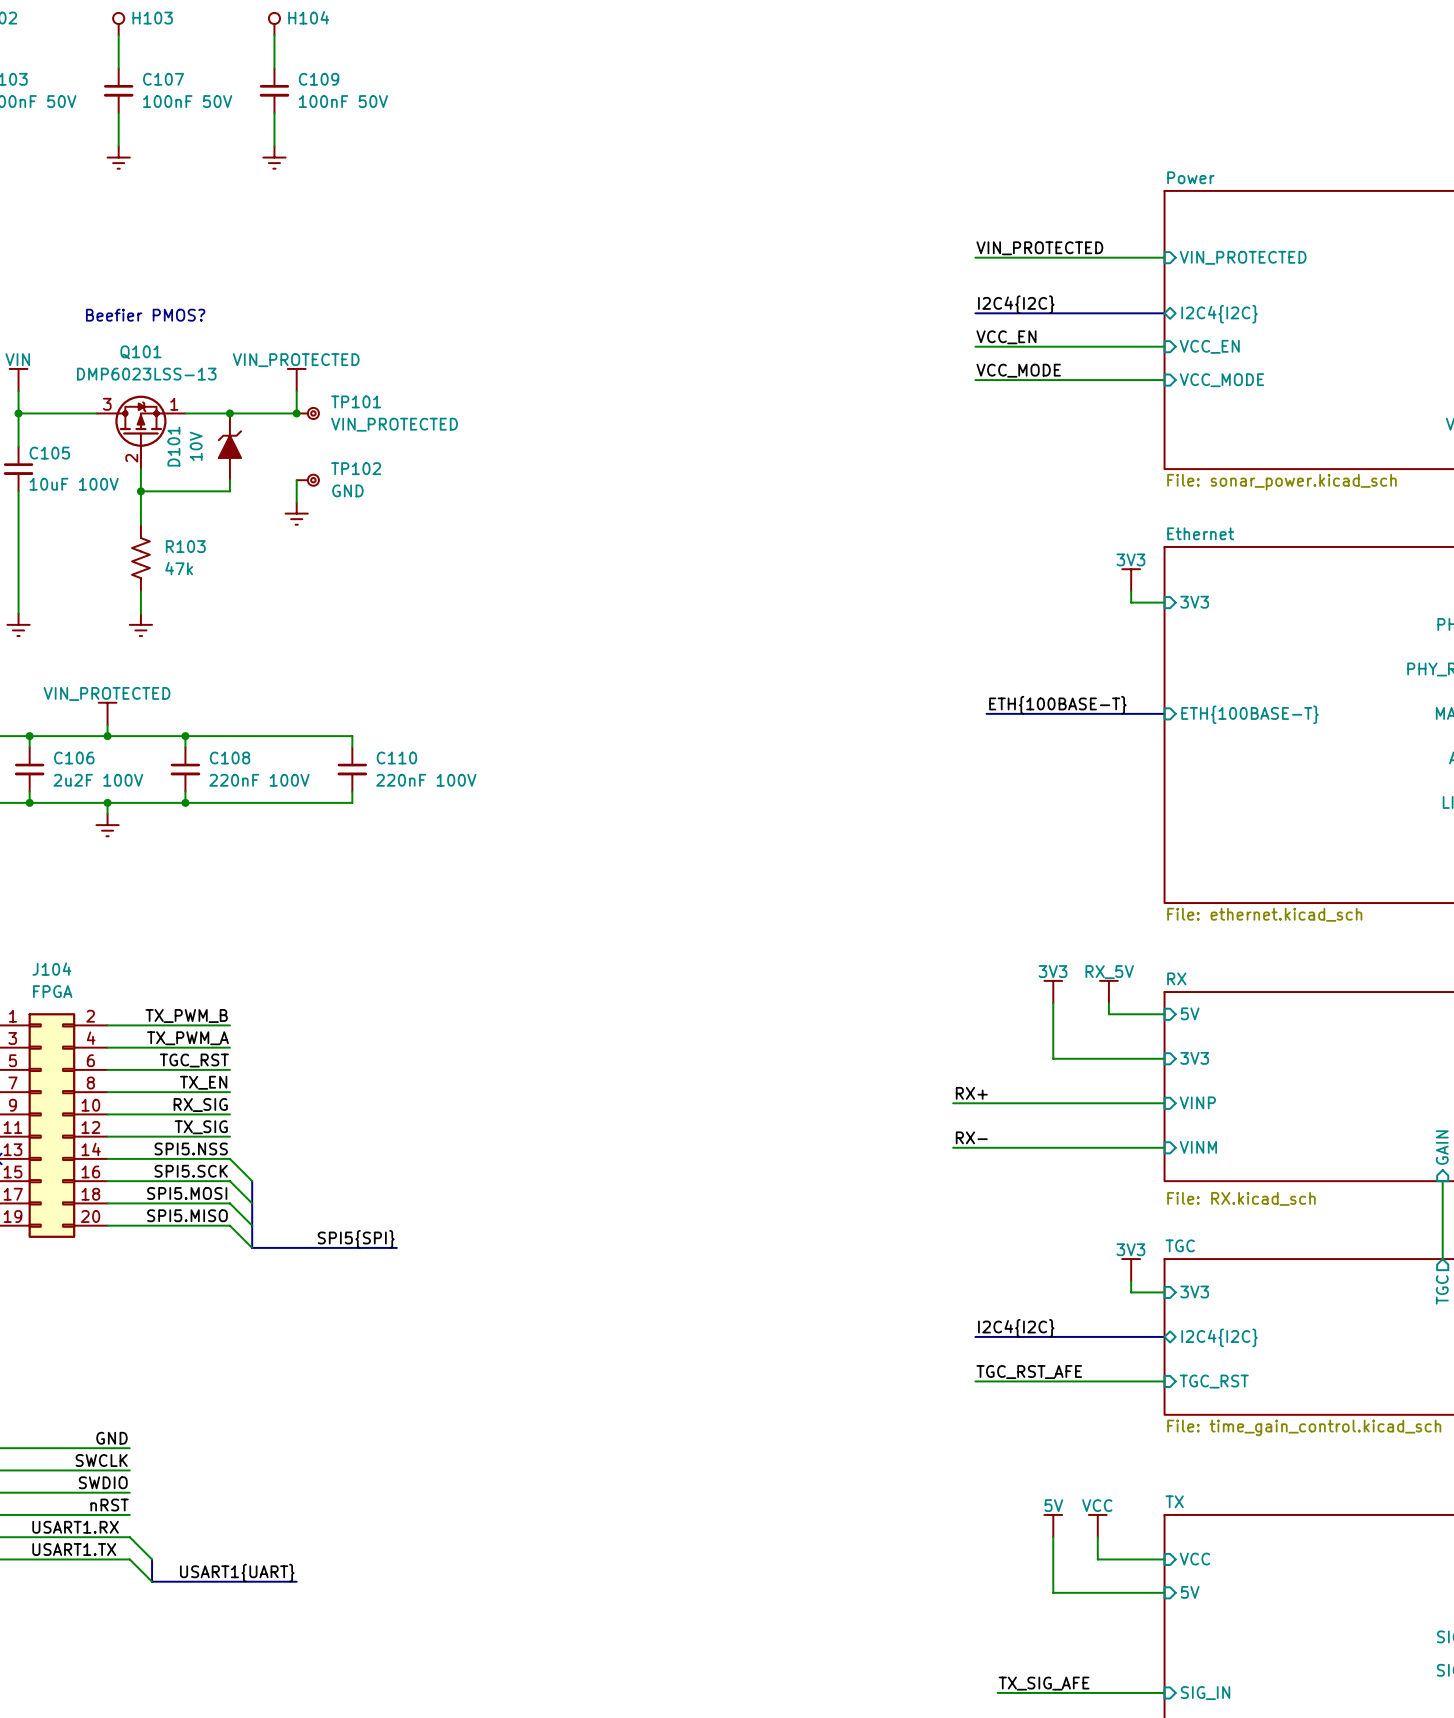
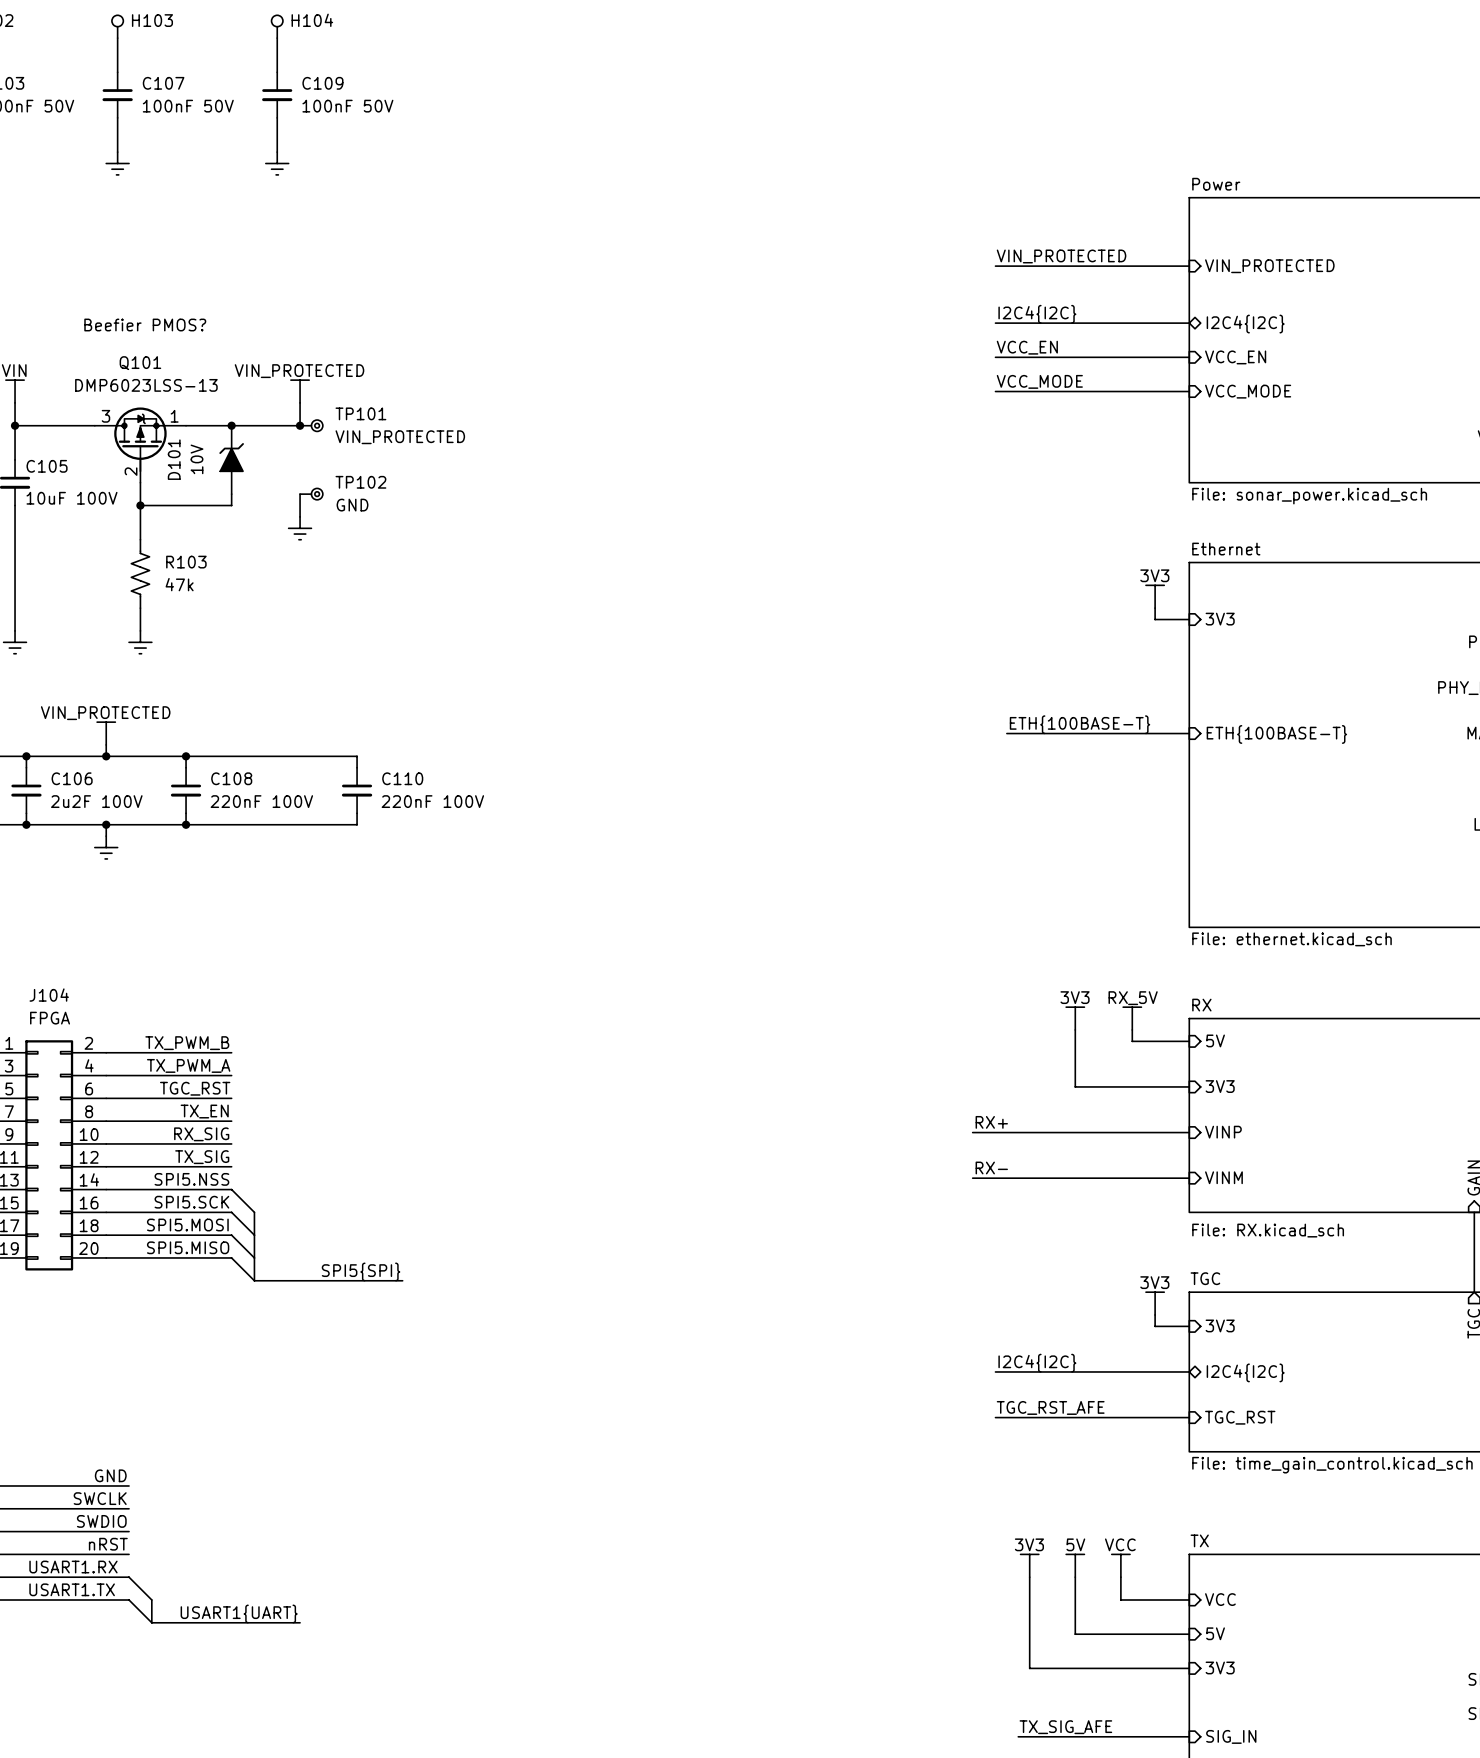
power symbol: none -> 3V3 (1029, 1565)
wire: none -> (1029, 1577) (1029, 1668) (1189, 1668)
sheet pin: none -> 3V3 (1220, 1667)

